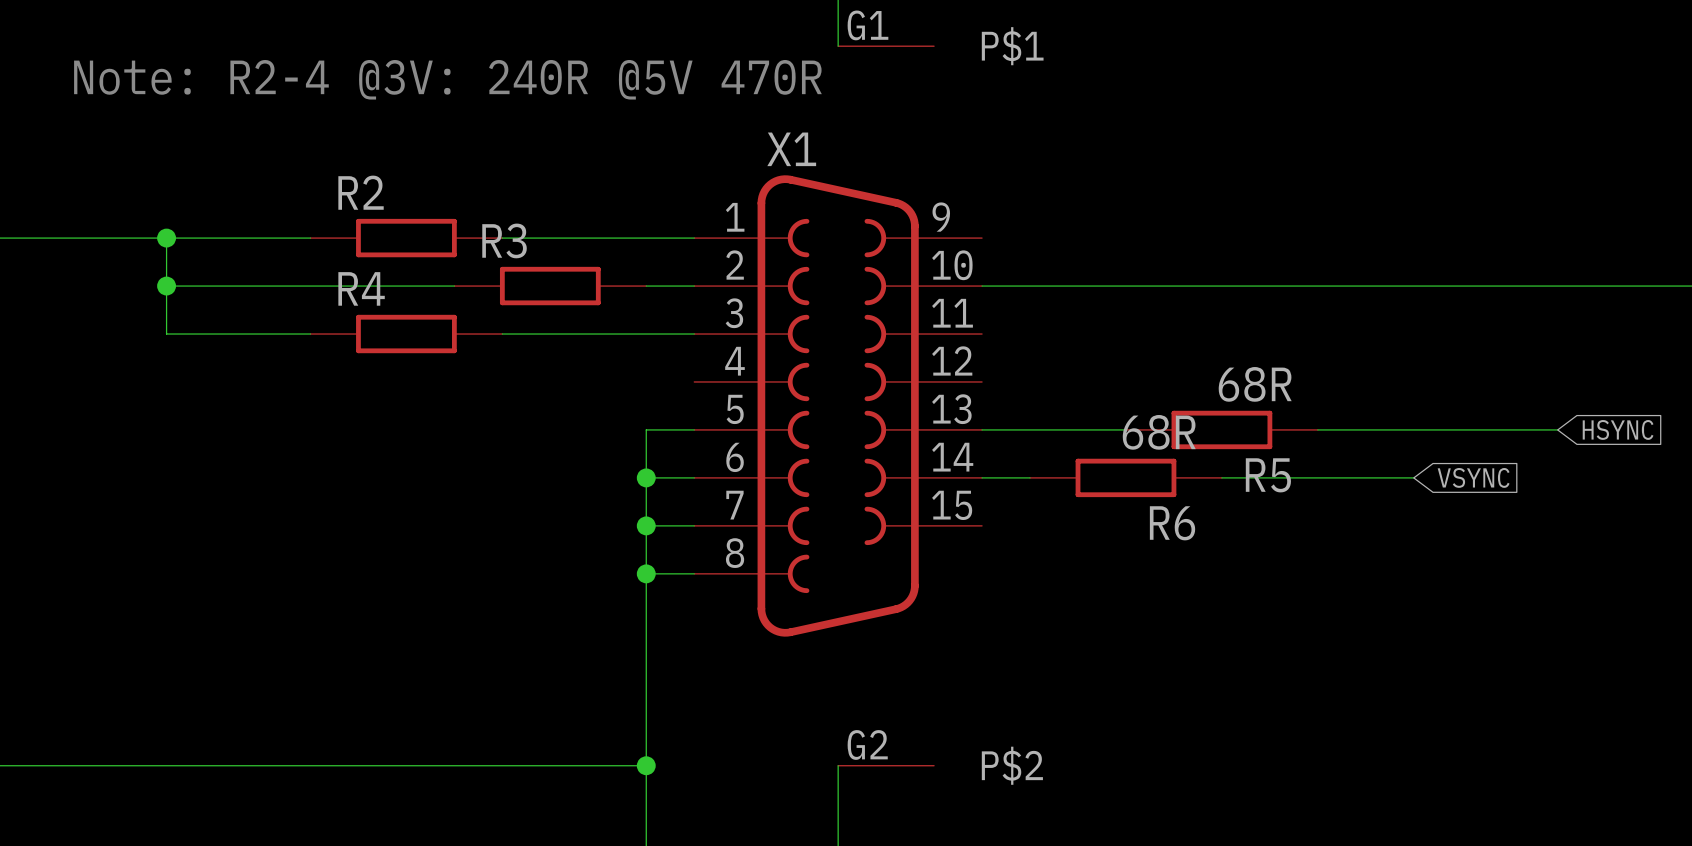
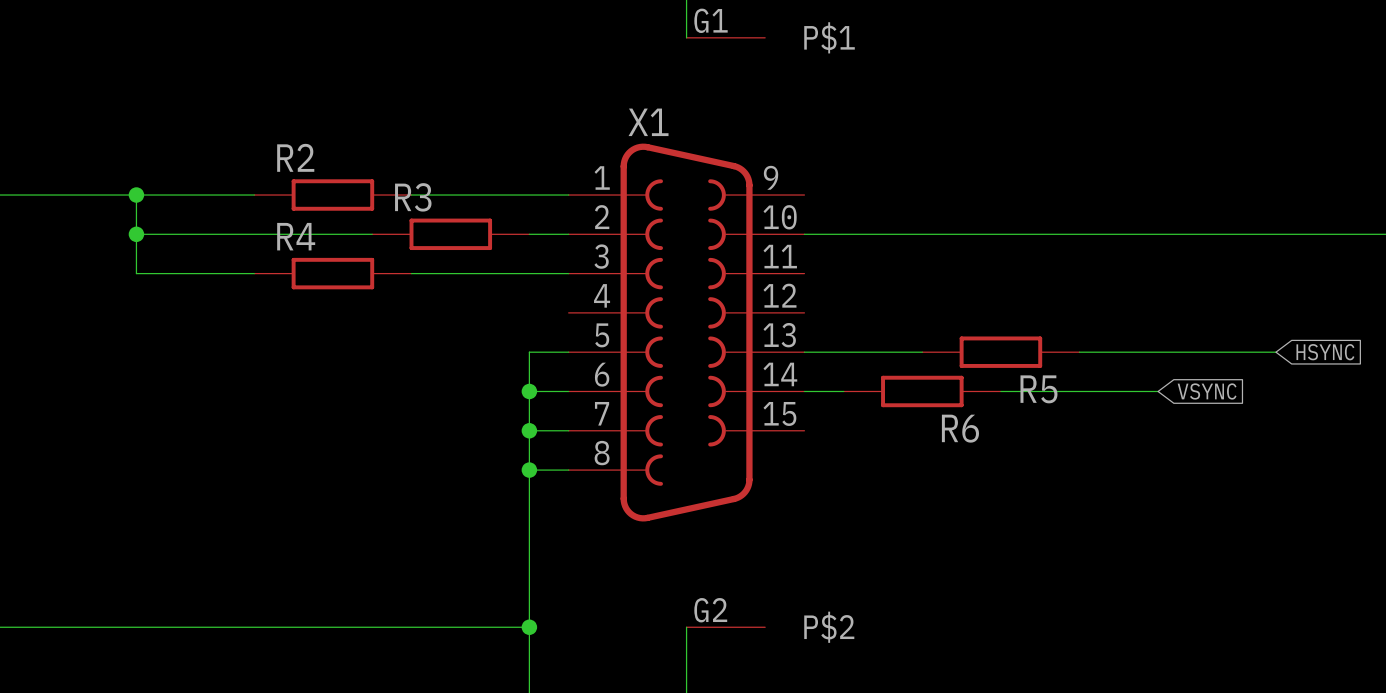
text: Note: R2-4 @3V: 240R @5V 470R (447, 79) -> none
R5 value: 68R (1255, 384) -> none
R6 value: 68R (1159, 432) -> none

